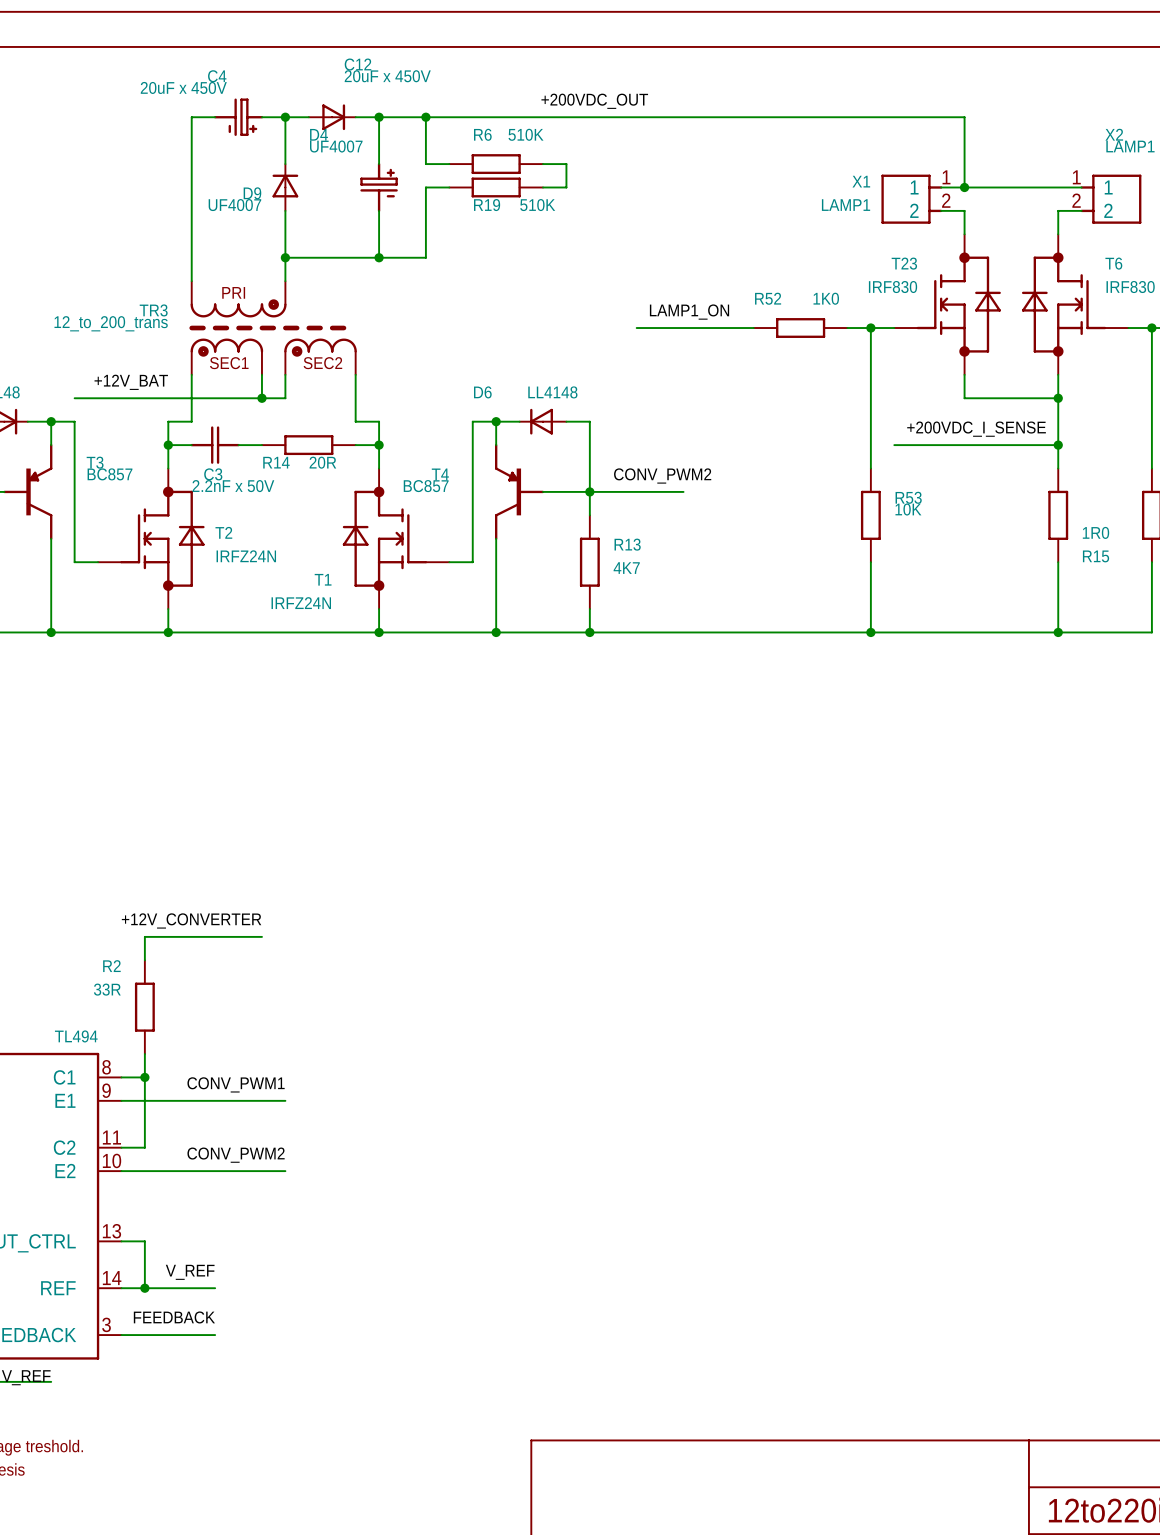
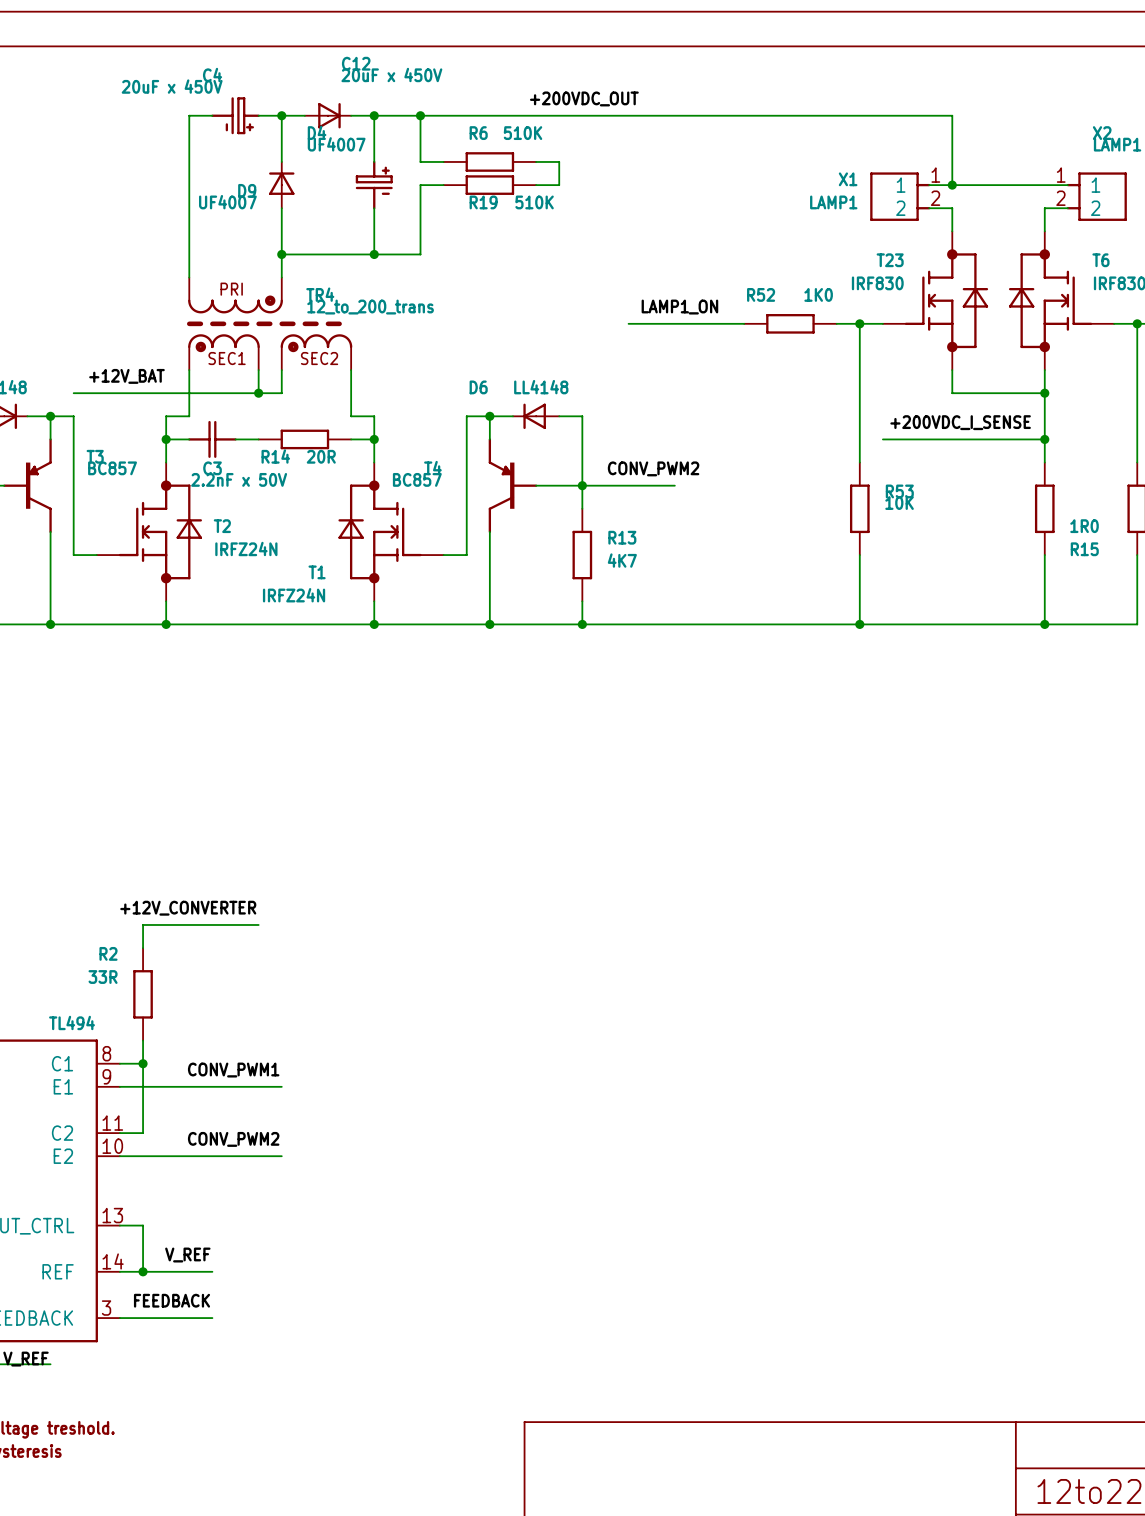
TR3 name: TR3 (153, 310) -> TR4 (320, 294)
TR3 value position: 12_to_200_trans (111, 323) -> 12_to_200_trans (370, 307)

